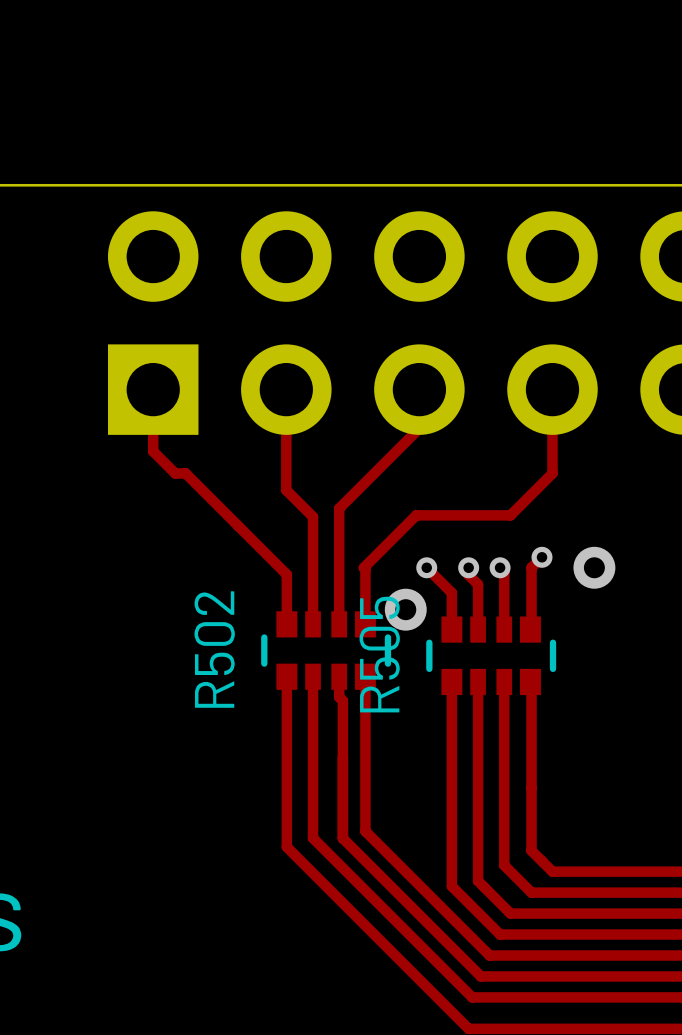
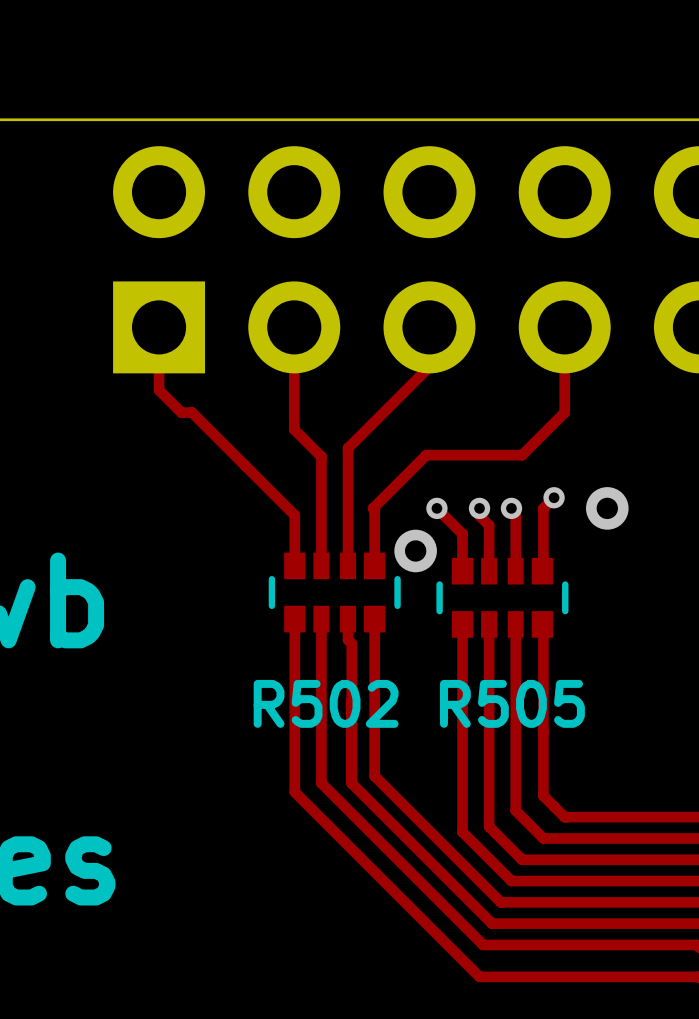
R502 name rotation: 0° (214, 649) -> 90° clockwise (326, 703)
R505 name rotation: 0° (379, 654) -> 90° clockwise (512, 703)

